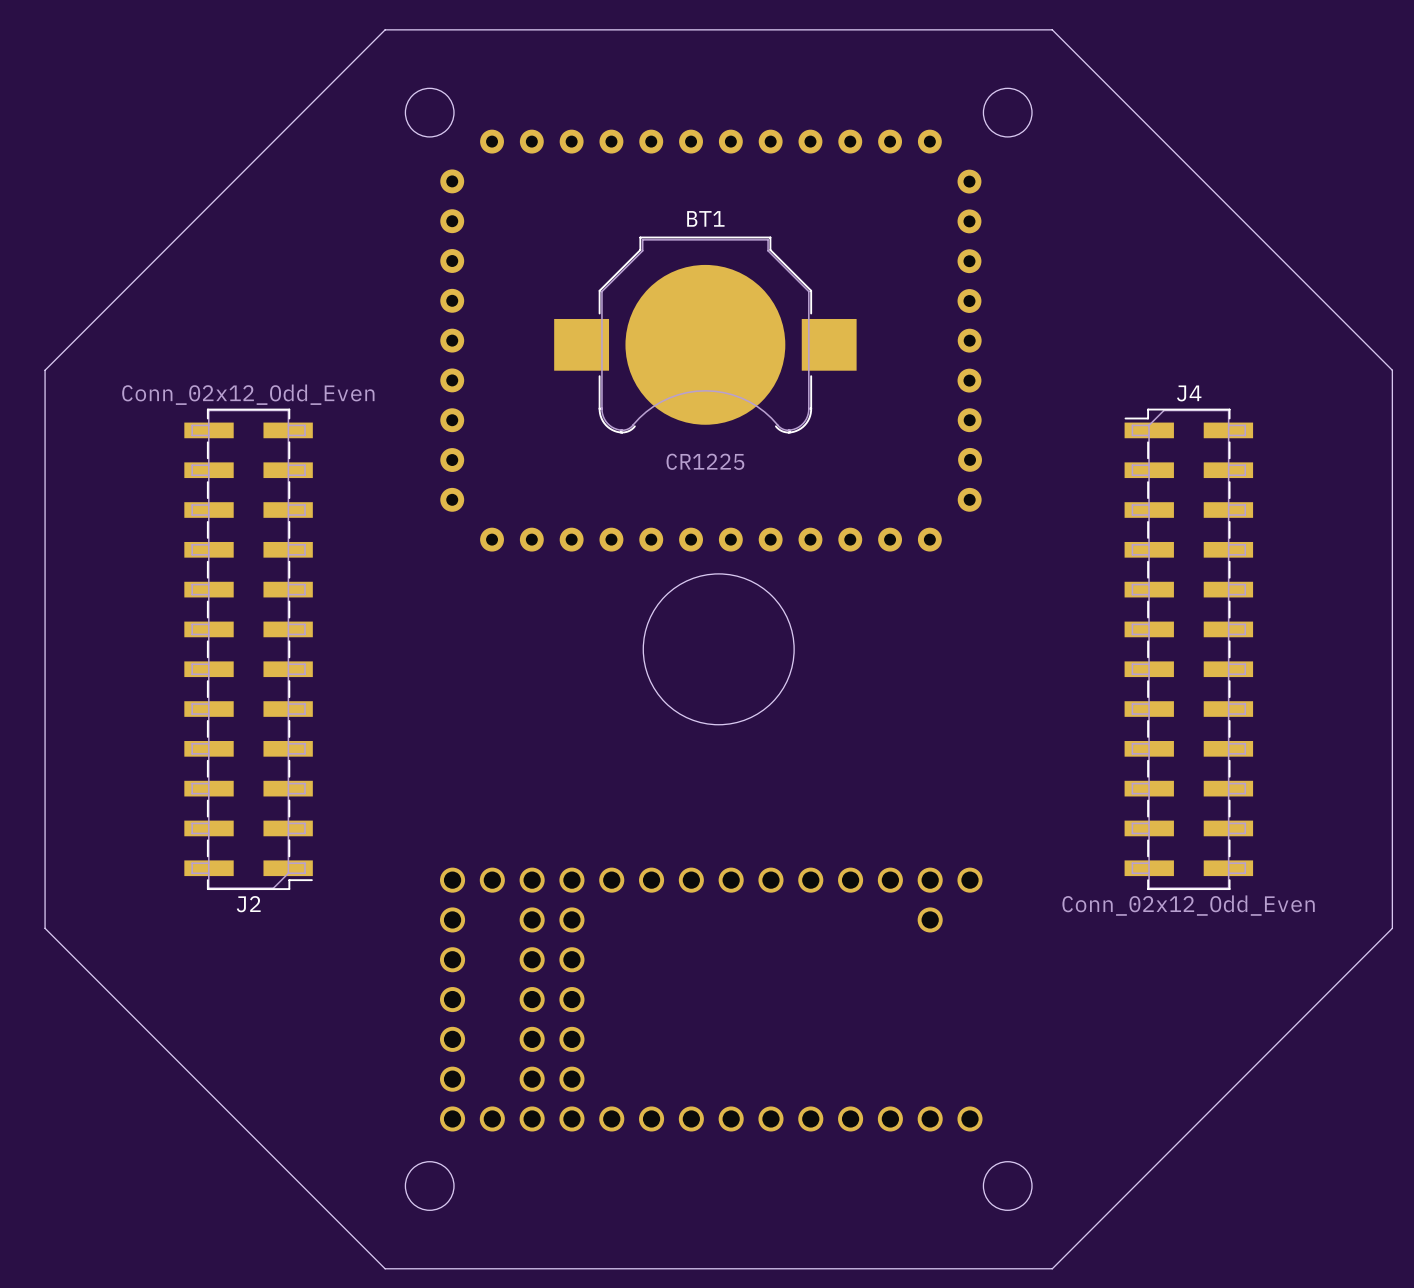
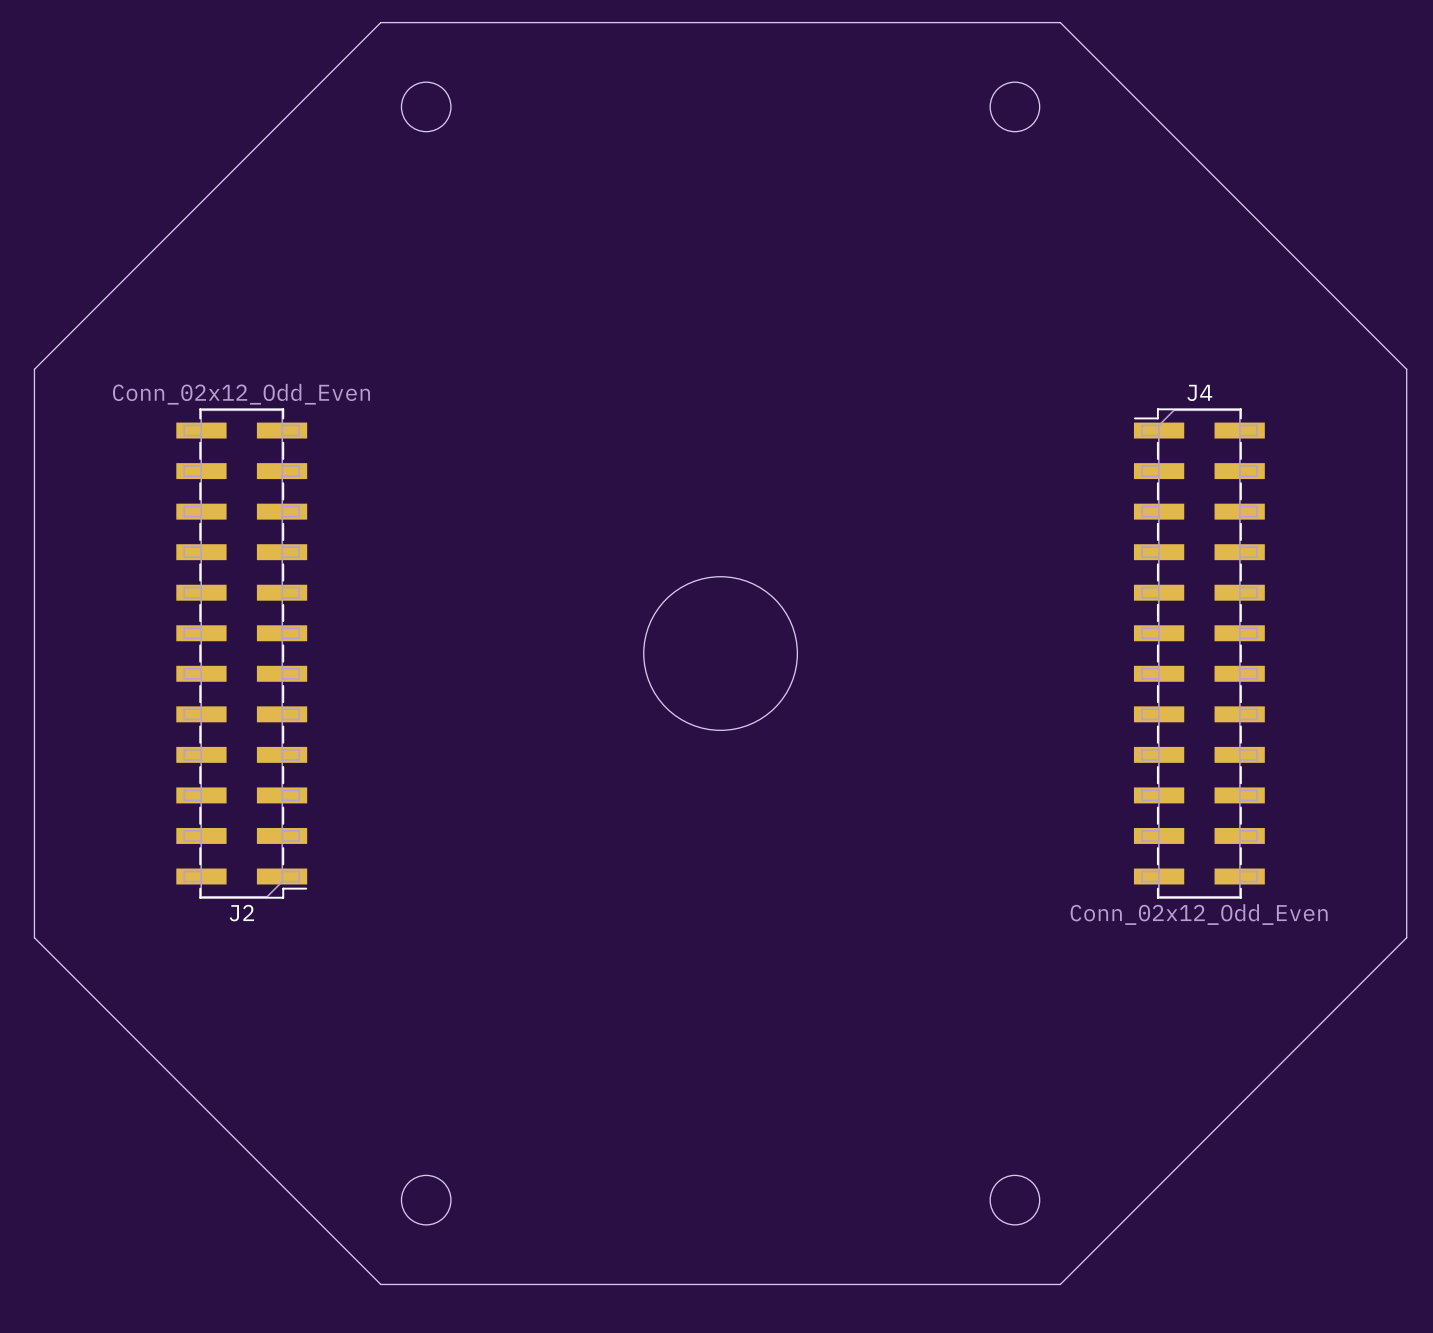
BT1: CR1225 (705, 335) -> none
part: (711, 340) -> none
part: (711, 999) -> none

